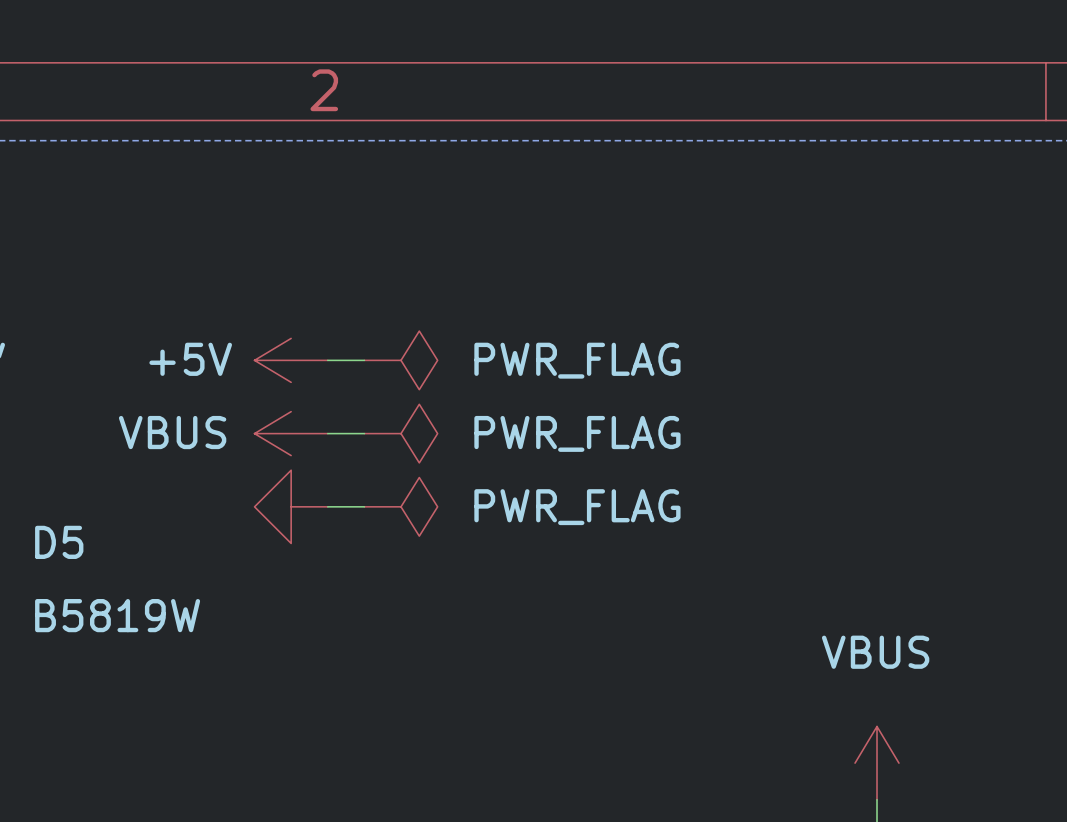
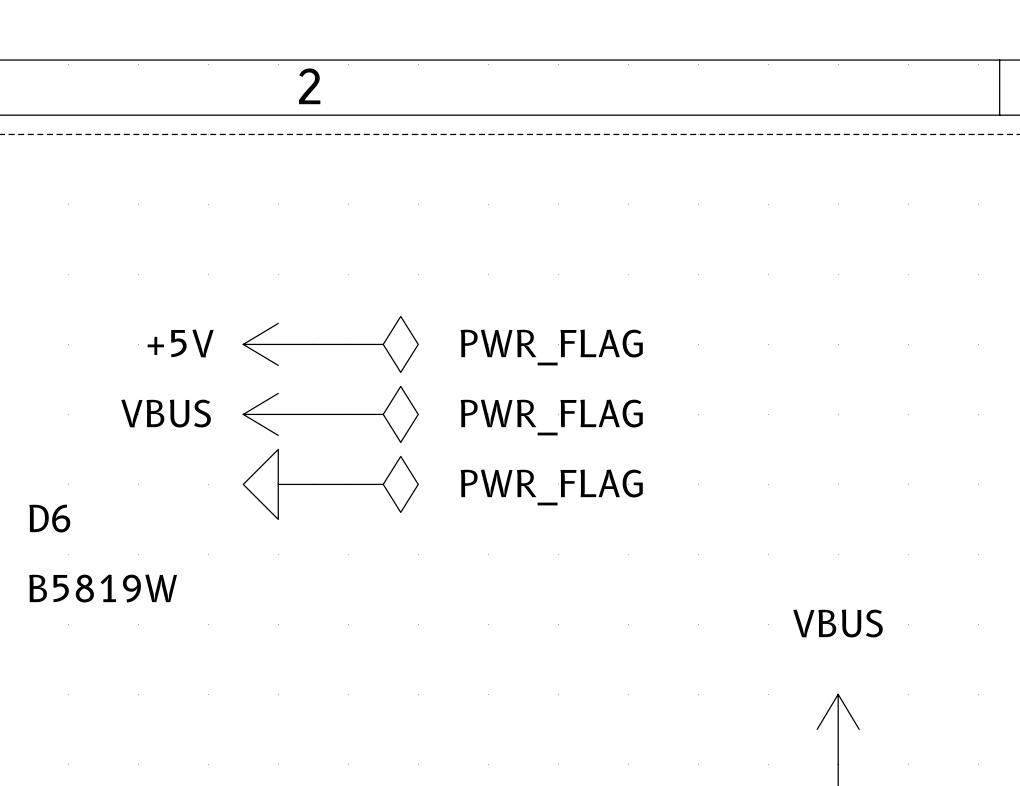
D5 name: D5 (59, 542) -> D6 (49, 518)

